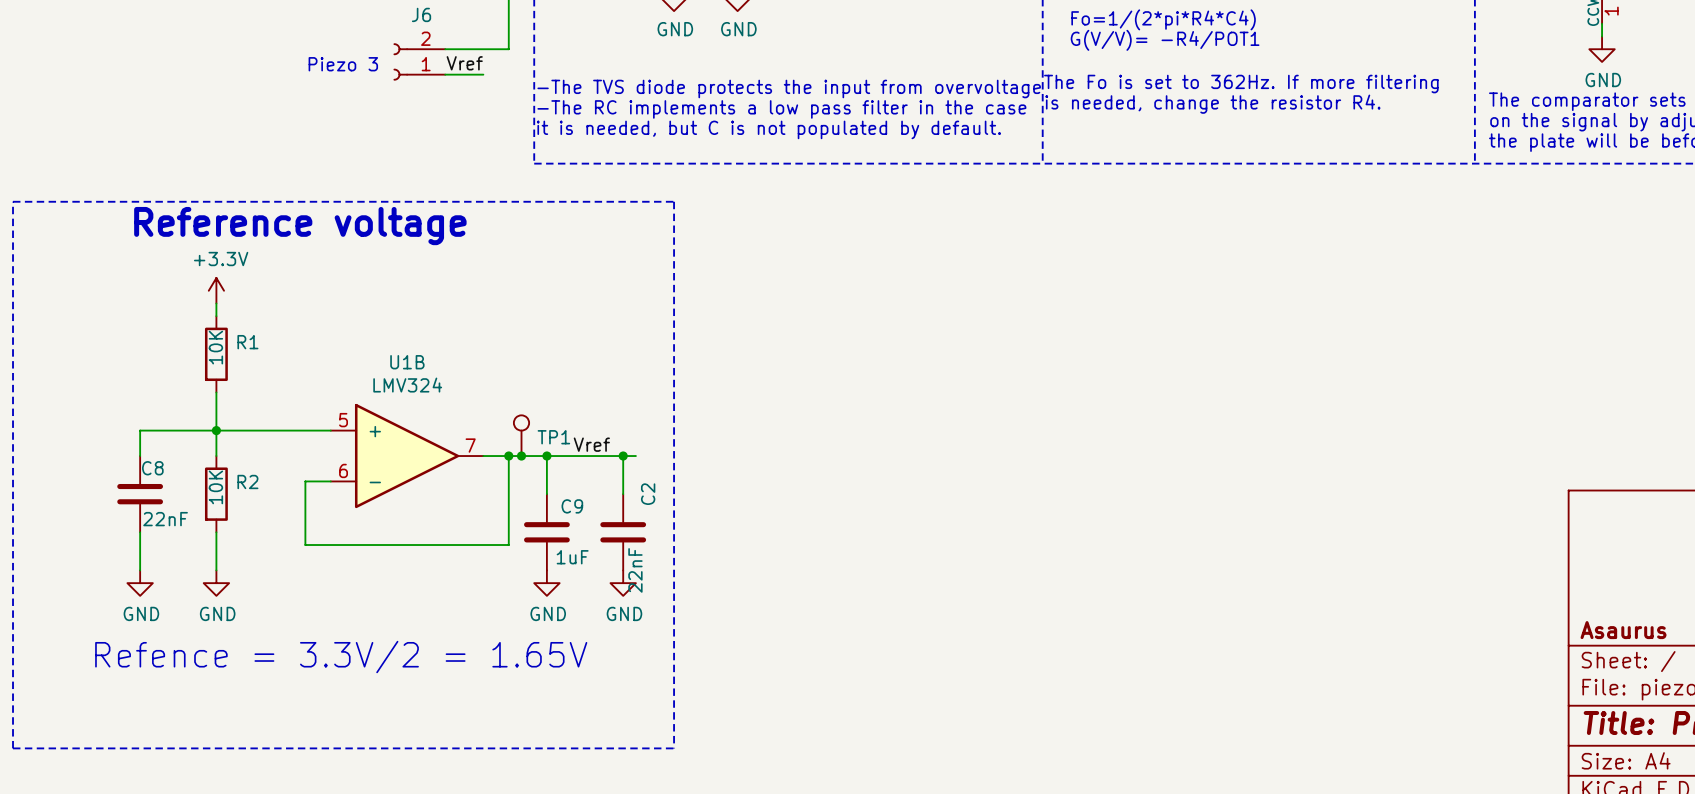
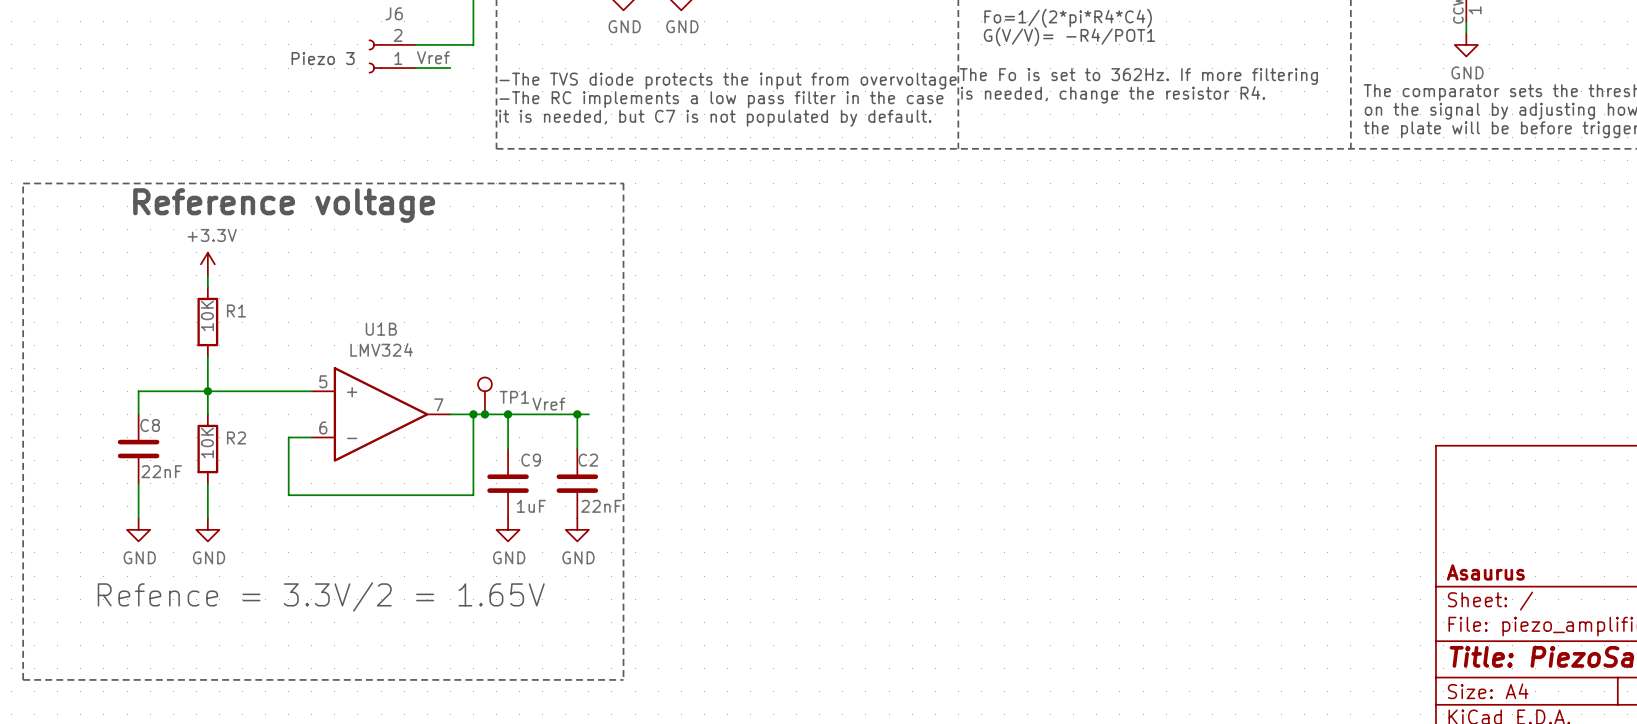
text: it is needed, but C is not populated by default. (768, 129) -> it is needed, but C7 is not populated by default. (715, 118)
C2 name rotation: 0° (648, 494) -> 90° clockwise (588, 460)
C2 value rotation: 0° (635, 570) -> 90° clockwise (601, 506)

